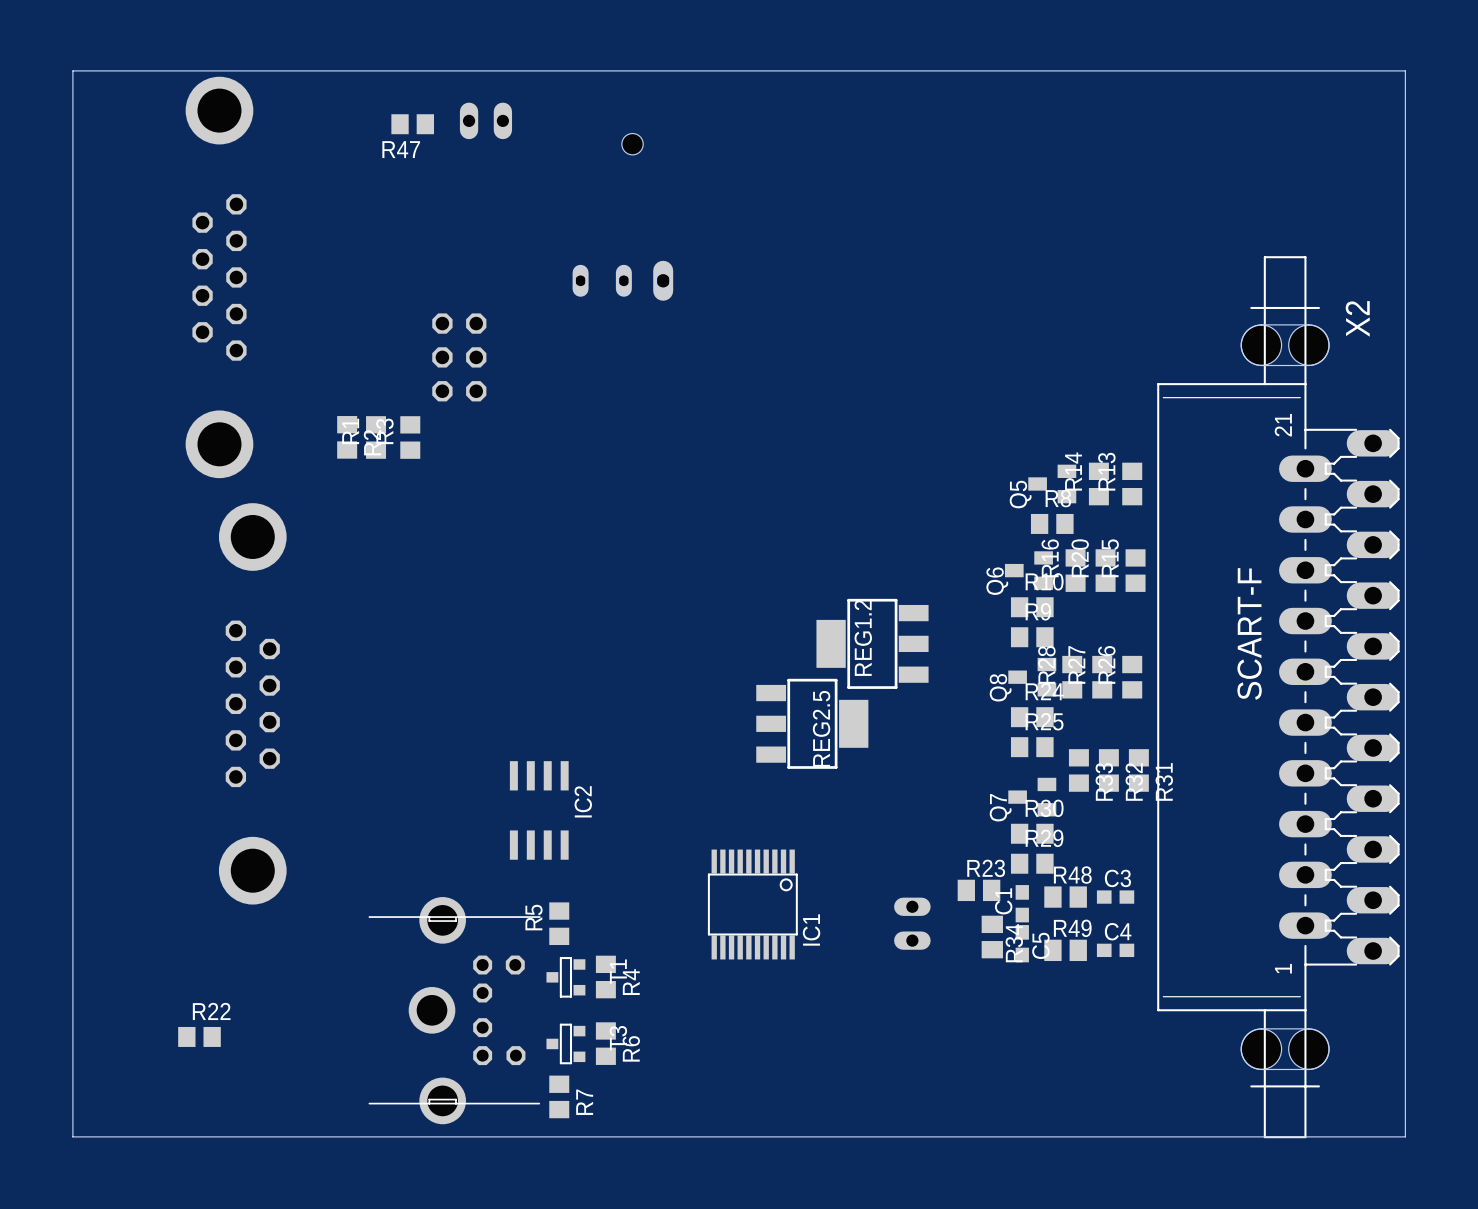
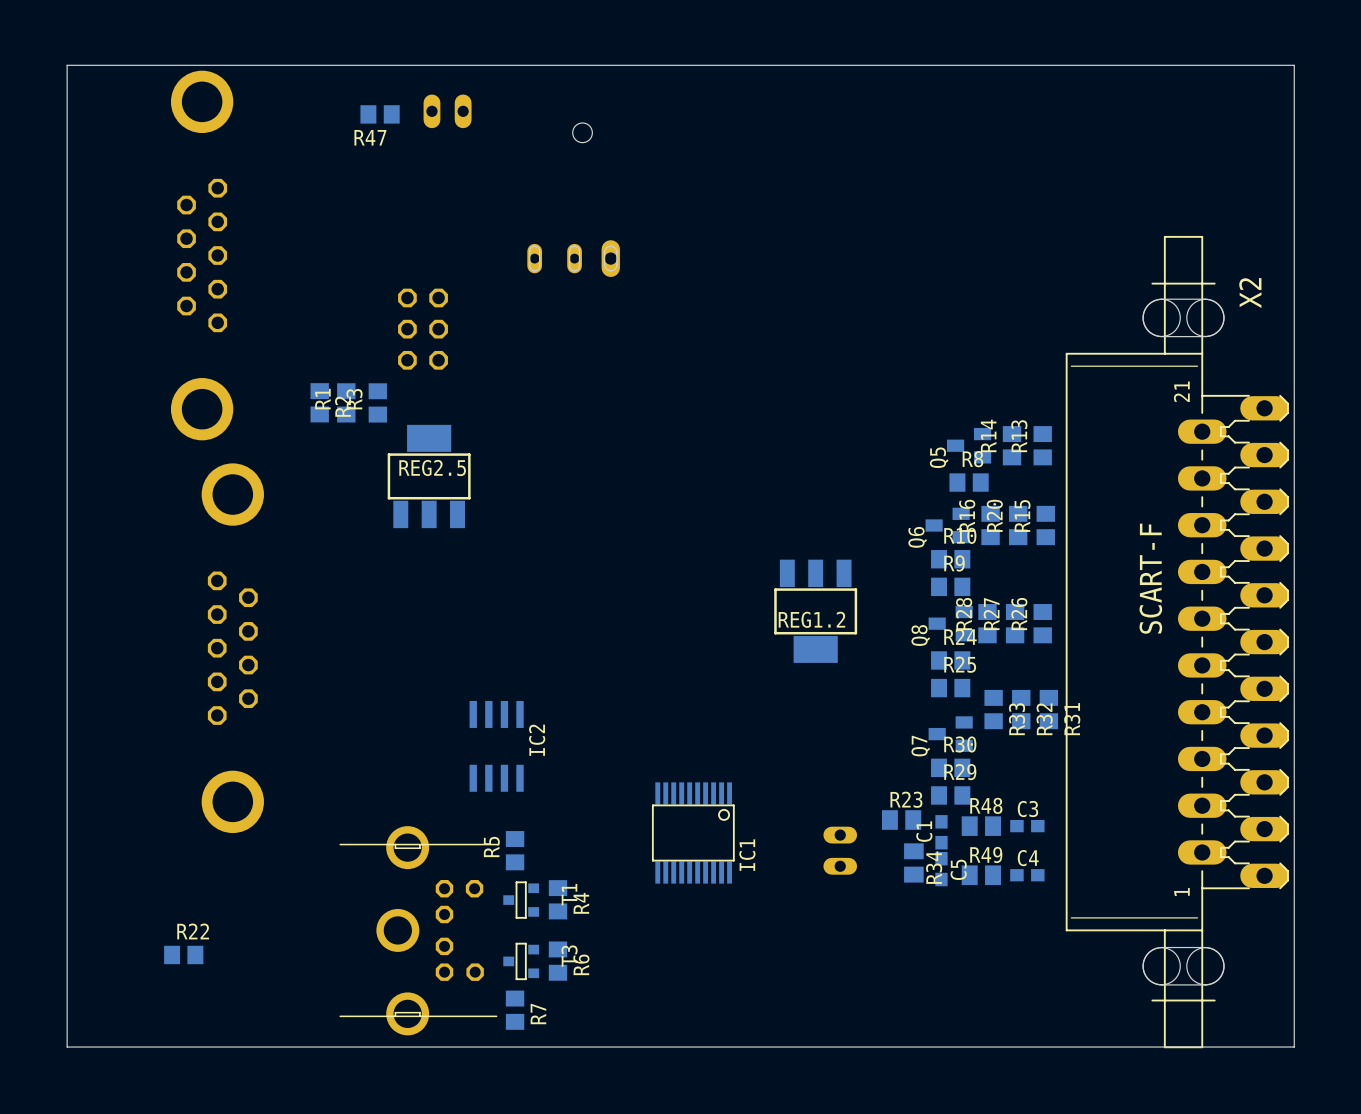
REG1.2 rotation: 0° (872, 643) -> 90° counterclockwise (815, 611)
REG2.5 rotation: 0° (812, 723) -> 90° counterclockwise (429, 476)
REG2.5 position: (812, 723) -> (429, 476)

